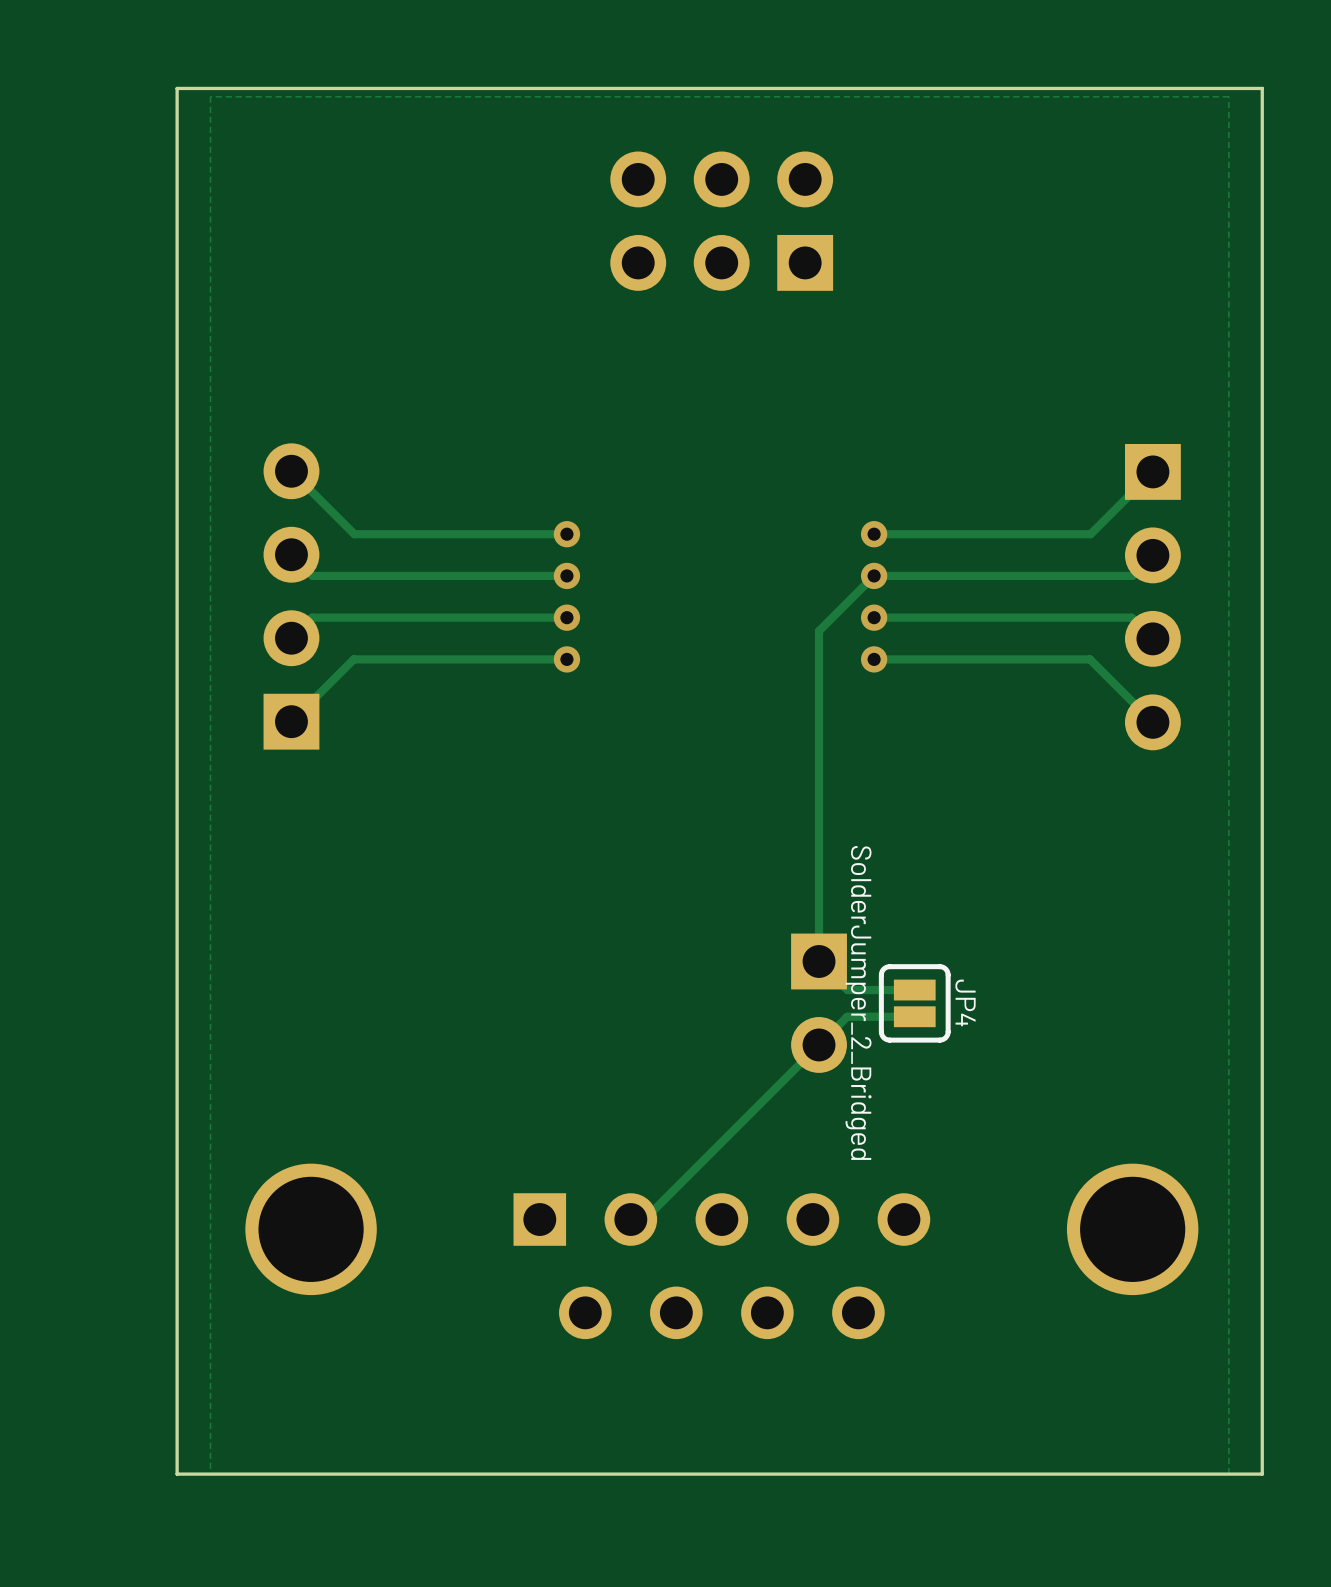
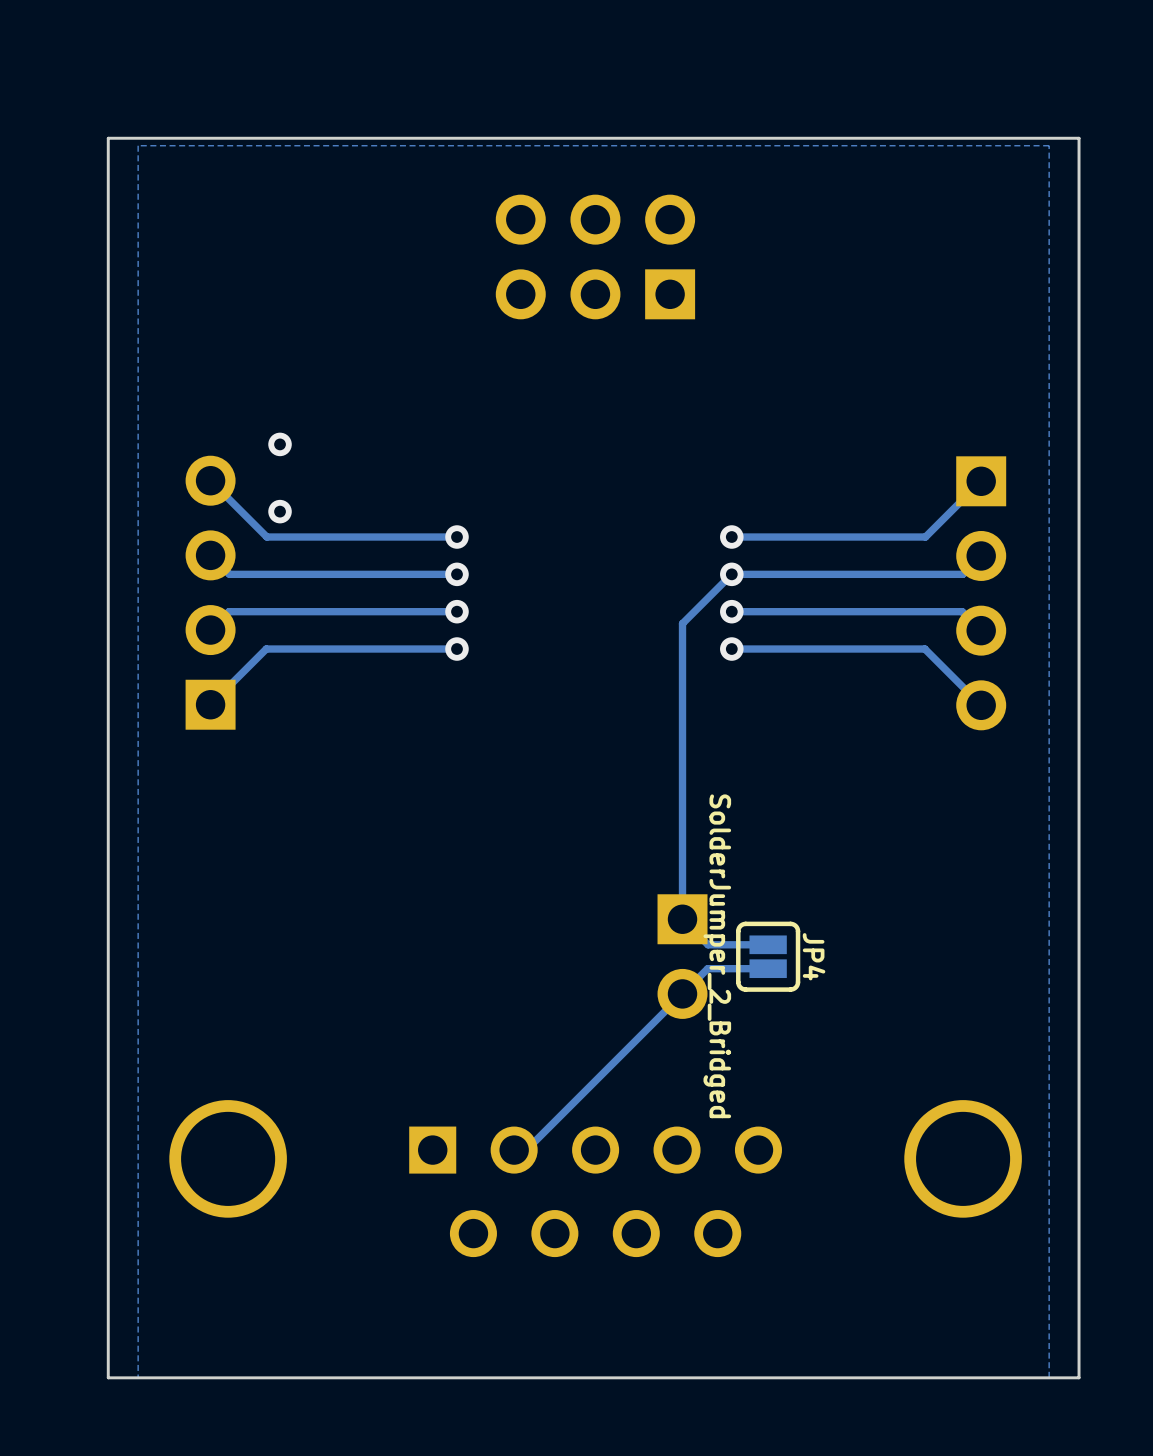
via: none -> (280, 444)
via: none -> (280, 511)

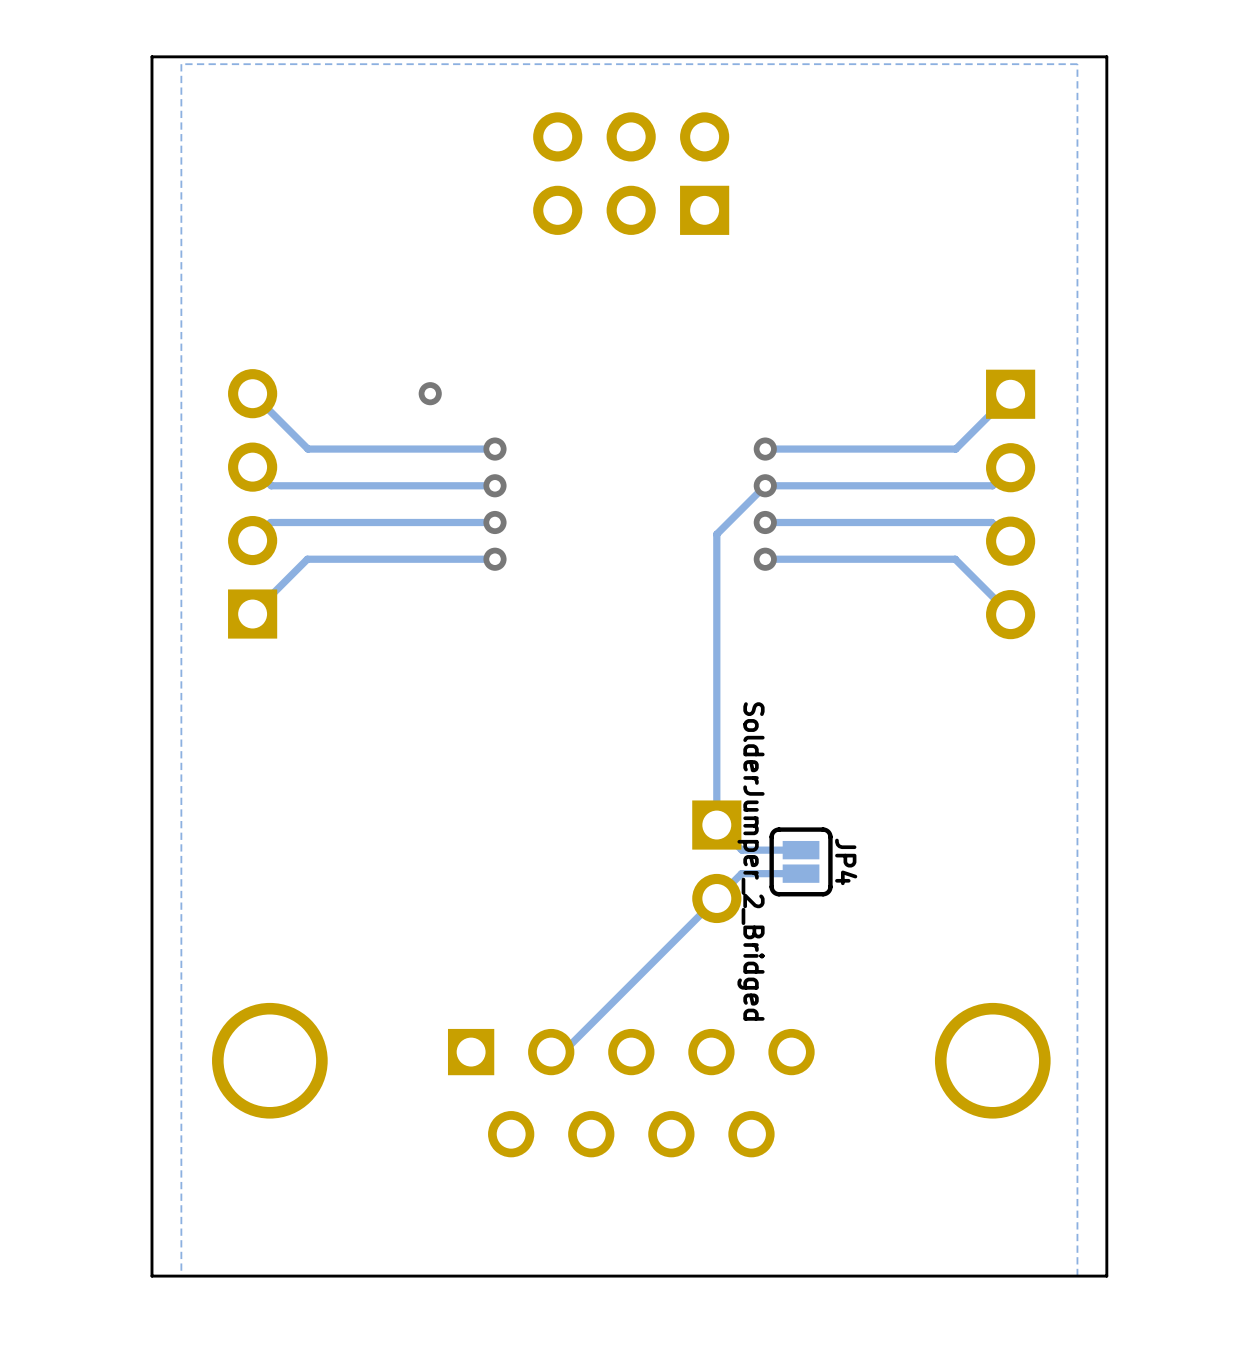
via: (280, 444) -> none
via: none -> (430, 393)
via: (280, 511) -> none

